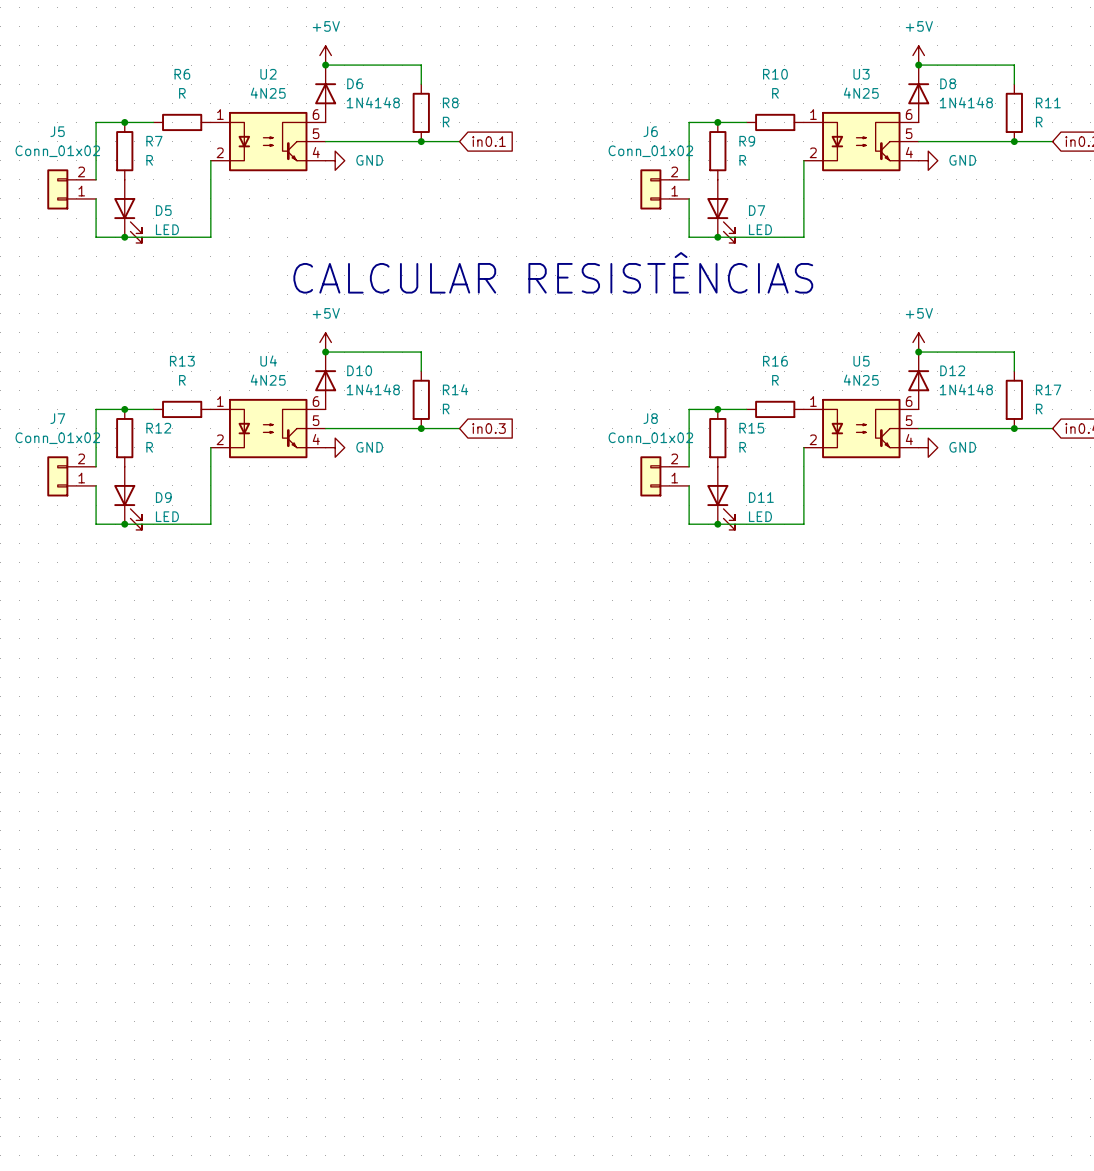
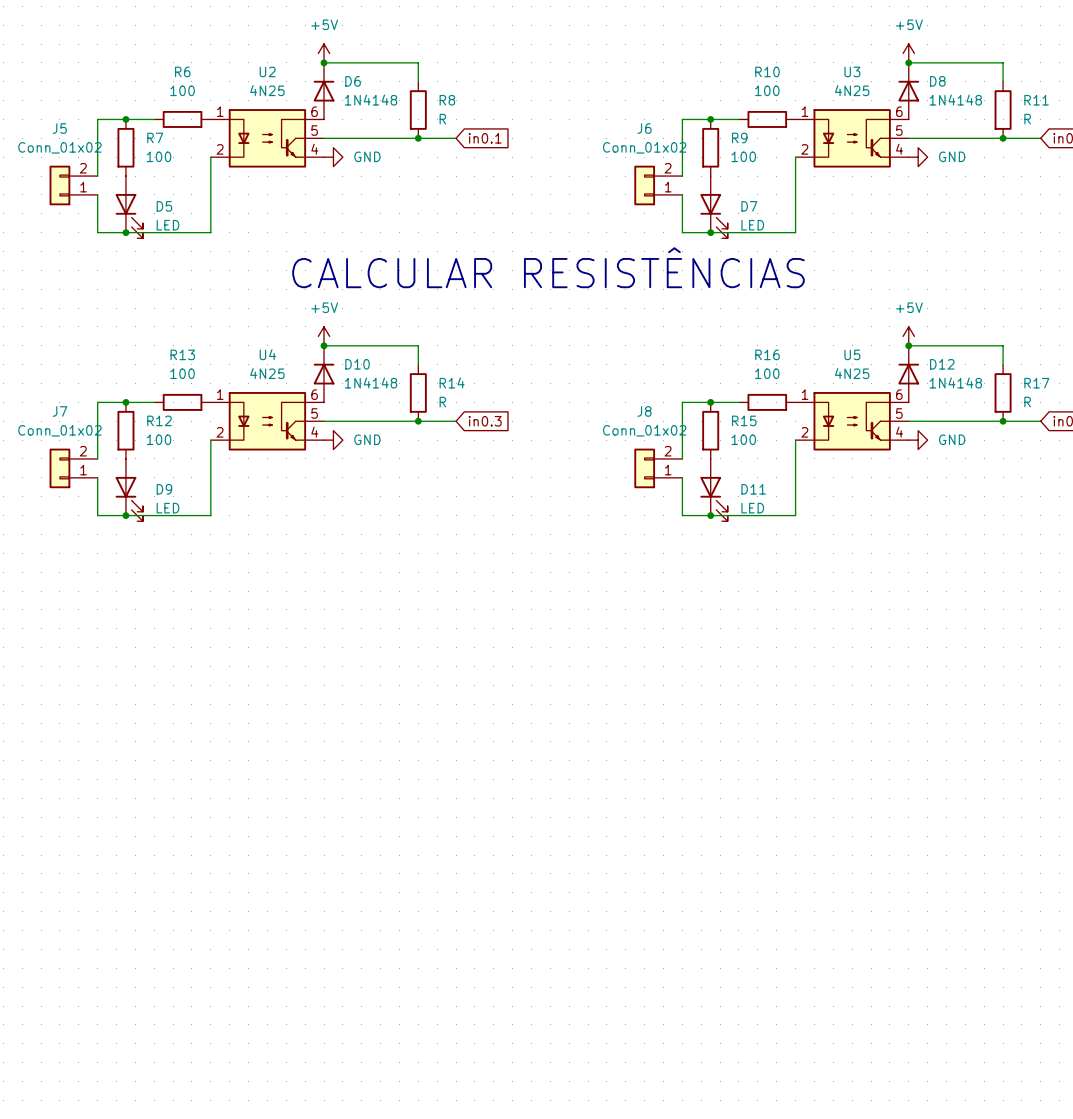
R6 value: R (182, 93) -> 100 (182, 90)
R10 value: R (775, 93) -> 100 (767, 90)
R7 value: R (149, 160) -> 100 (159, 156)
R9 value: R (742, 160) -> 100 (743, 156)
R13 value: R (182, 380) -> 100 (182, 373)
R16 value: R (775, 380) -> 100 (767, 373)
R12 value: R (149, 447) -> 100 (159, 439)
R15 value: R (742, 447) -> 100 (743, 439)

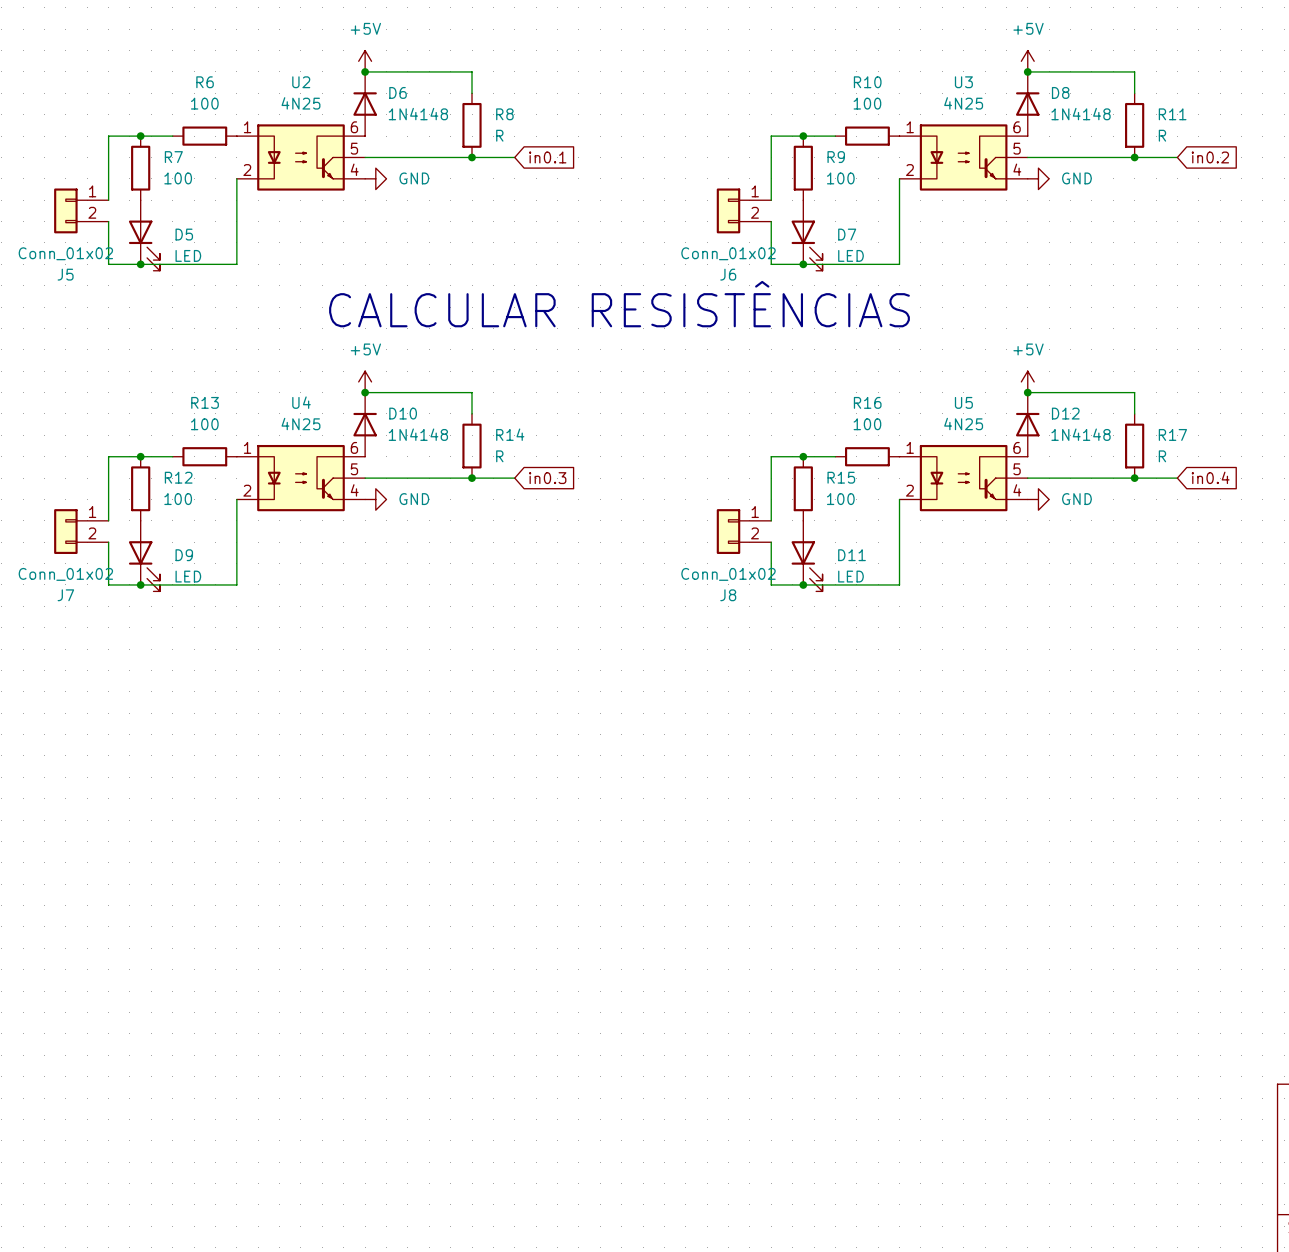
J5 flip: as is (59, 185) -> up-down (65, 210)
J6 flip: as is (644, 185) -> up-down (728, 210)
J7 flip: as is (59, 468) -> up-down (65, 531)
J8 flip: as is (644, 468) -> up-down (728, 531)

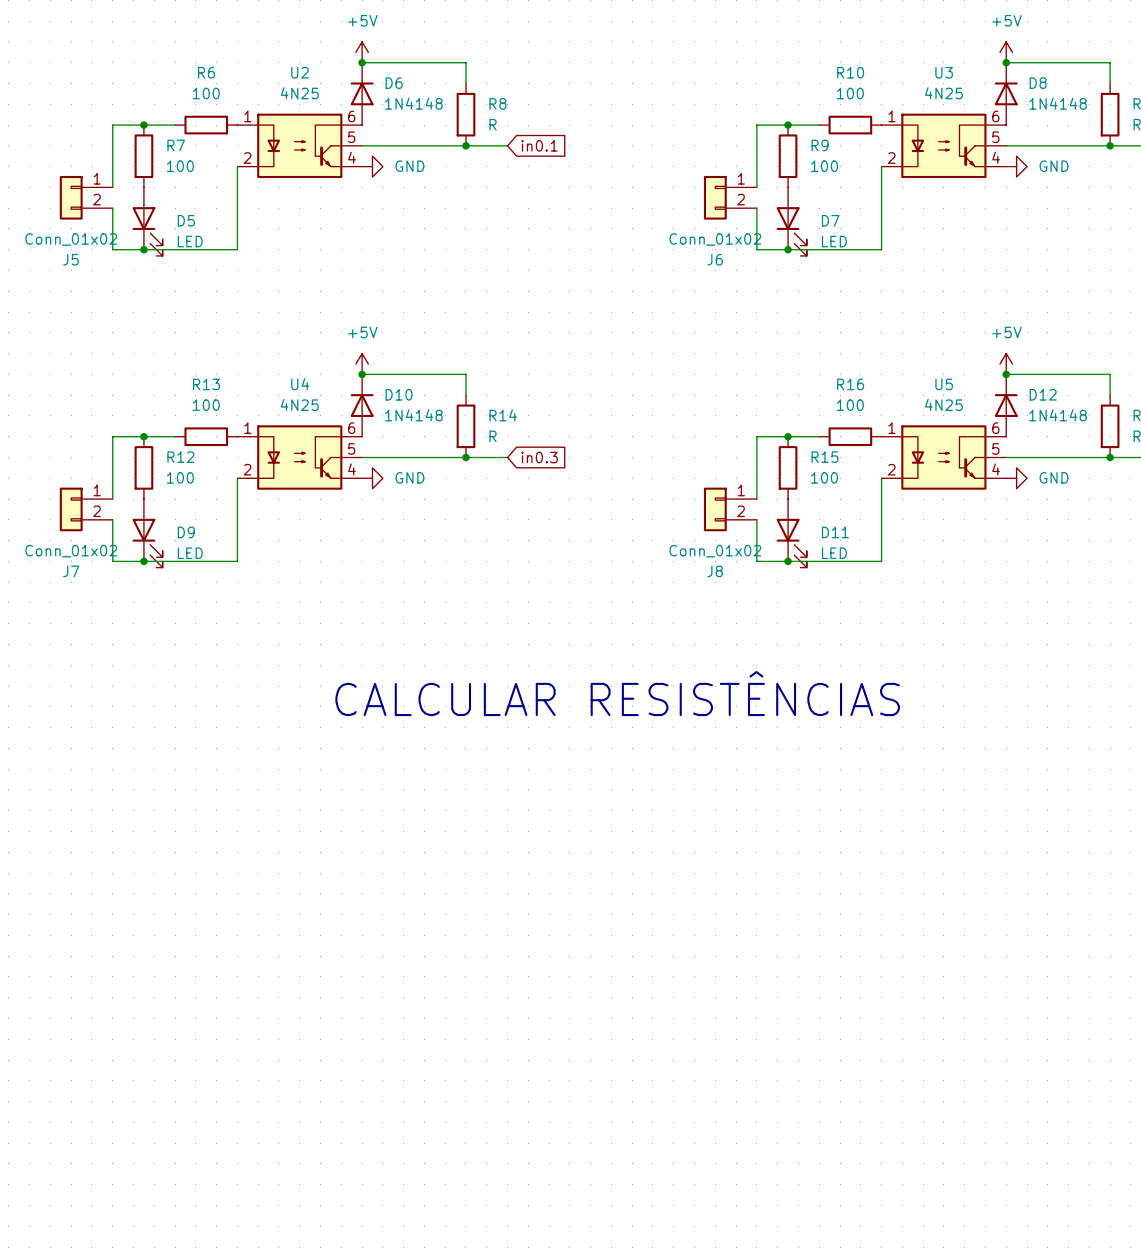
text: CALCULAR RESISTÊNCIAS (619, 304) -> none
text: none -> CALCULAR RESISTÊNCIAS (617, 693)

